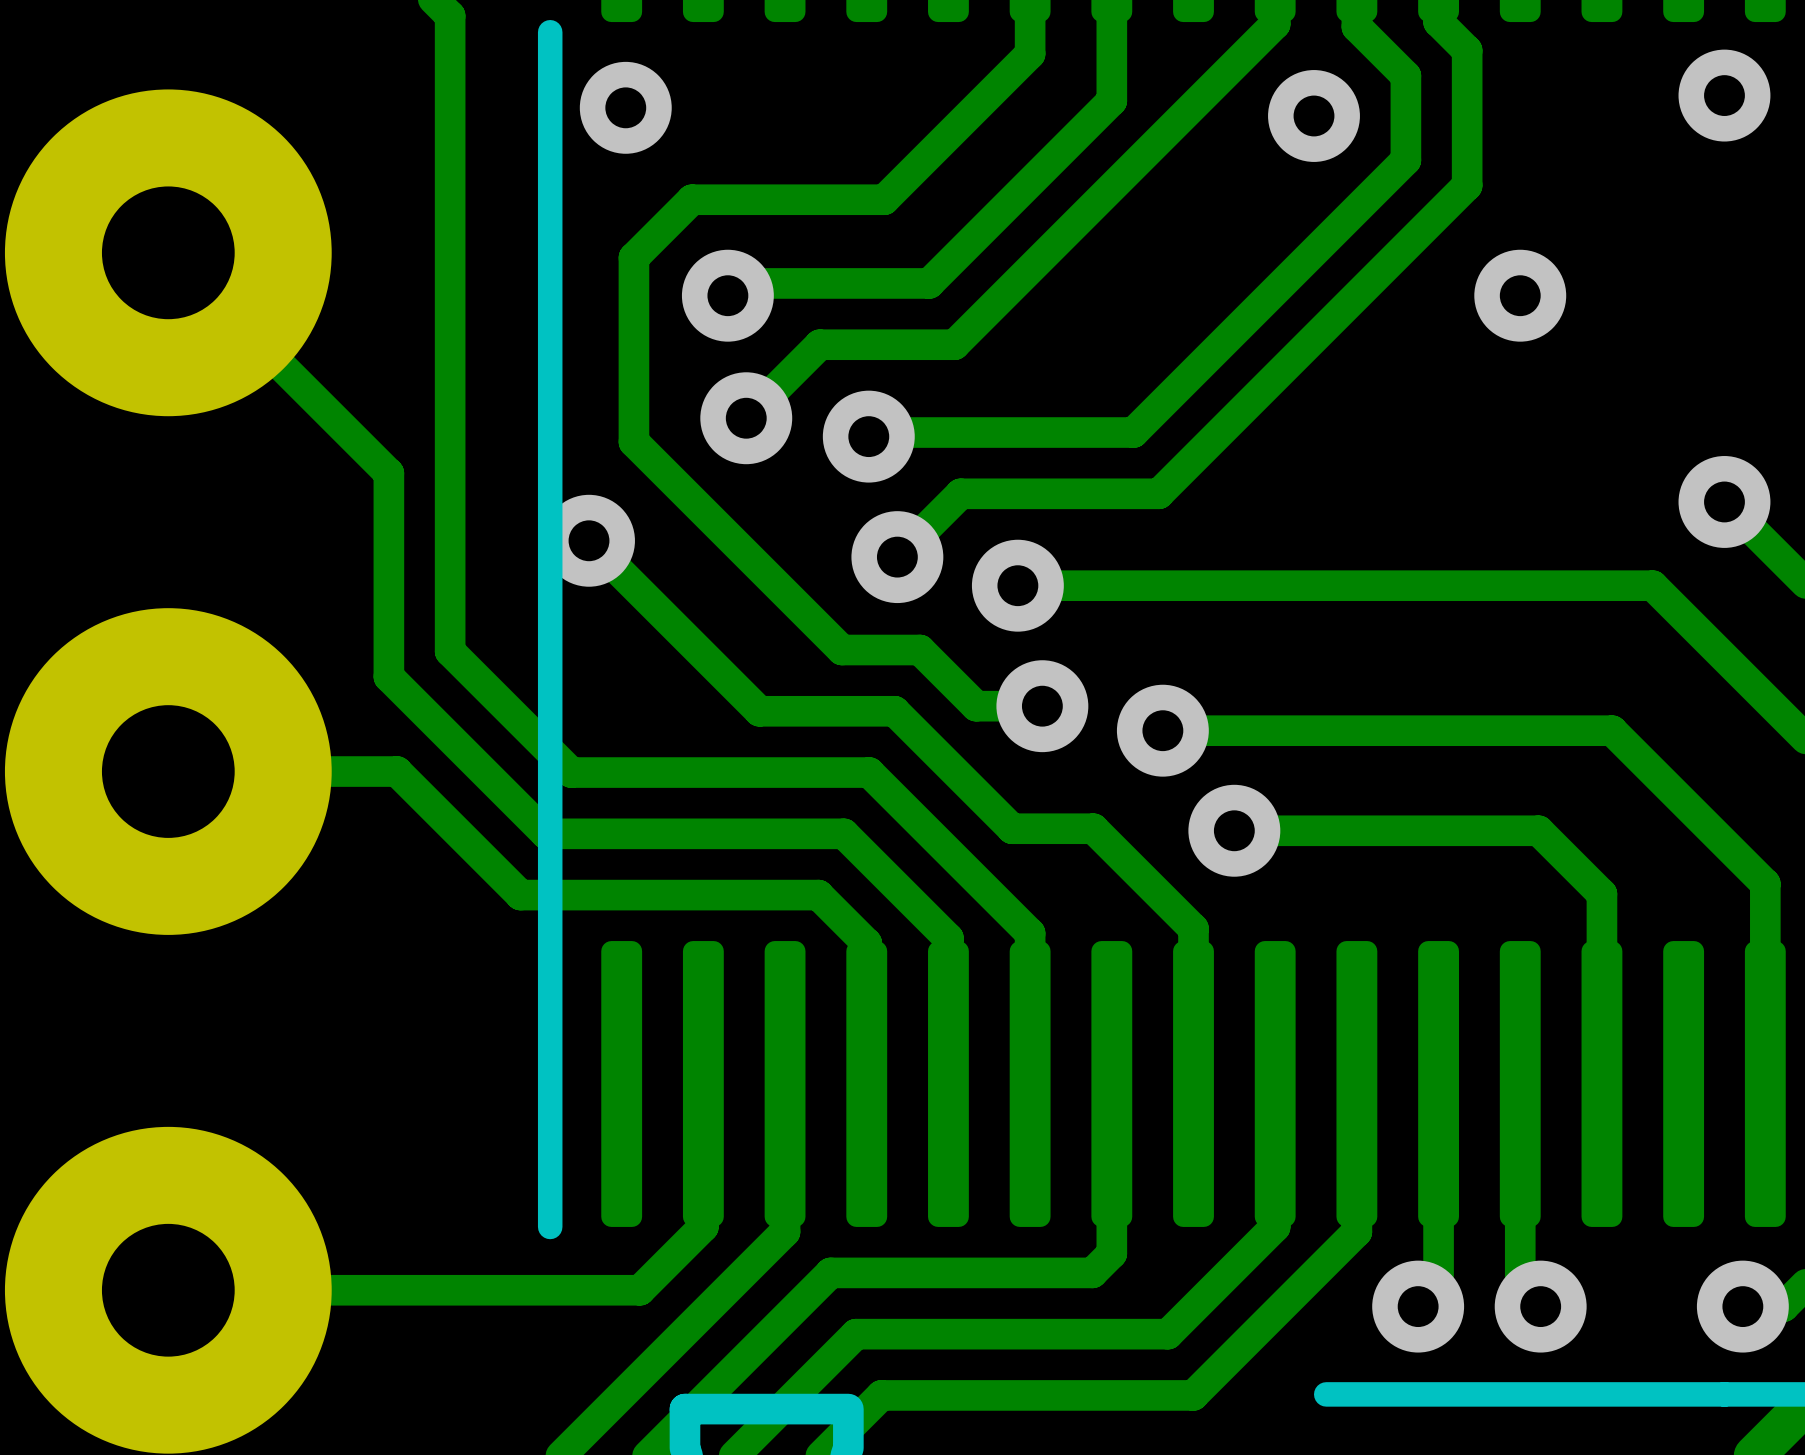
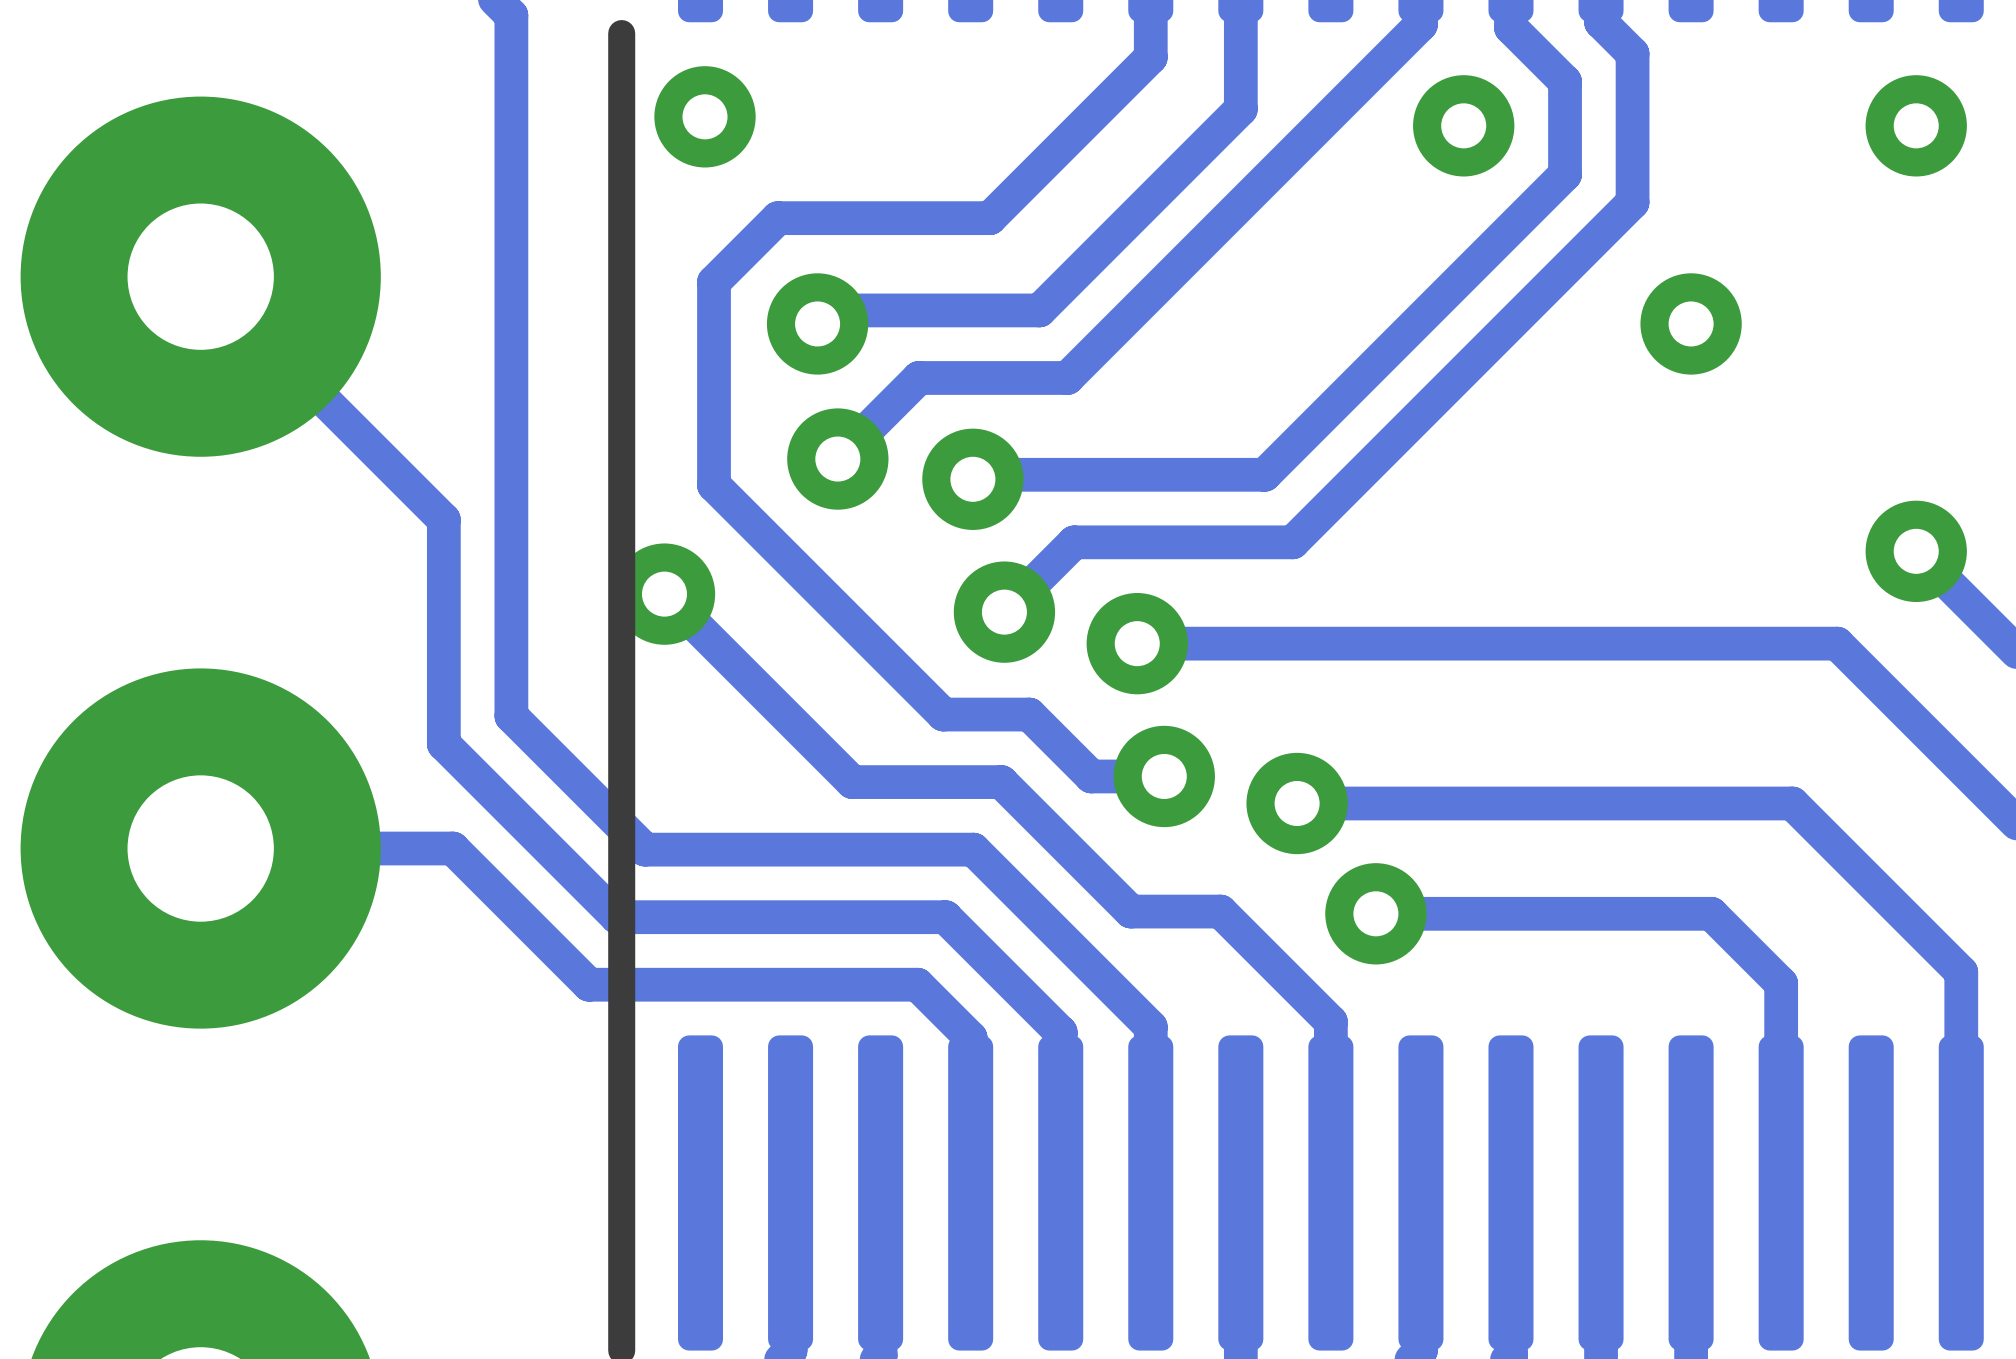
via position: (1724, 95) -> (1916, 125)

